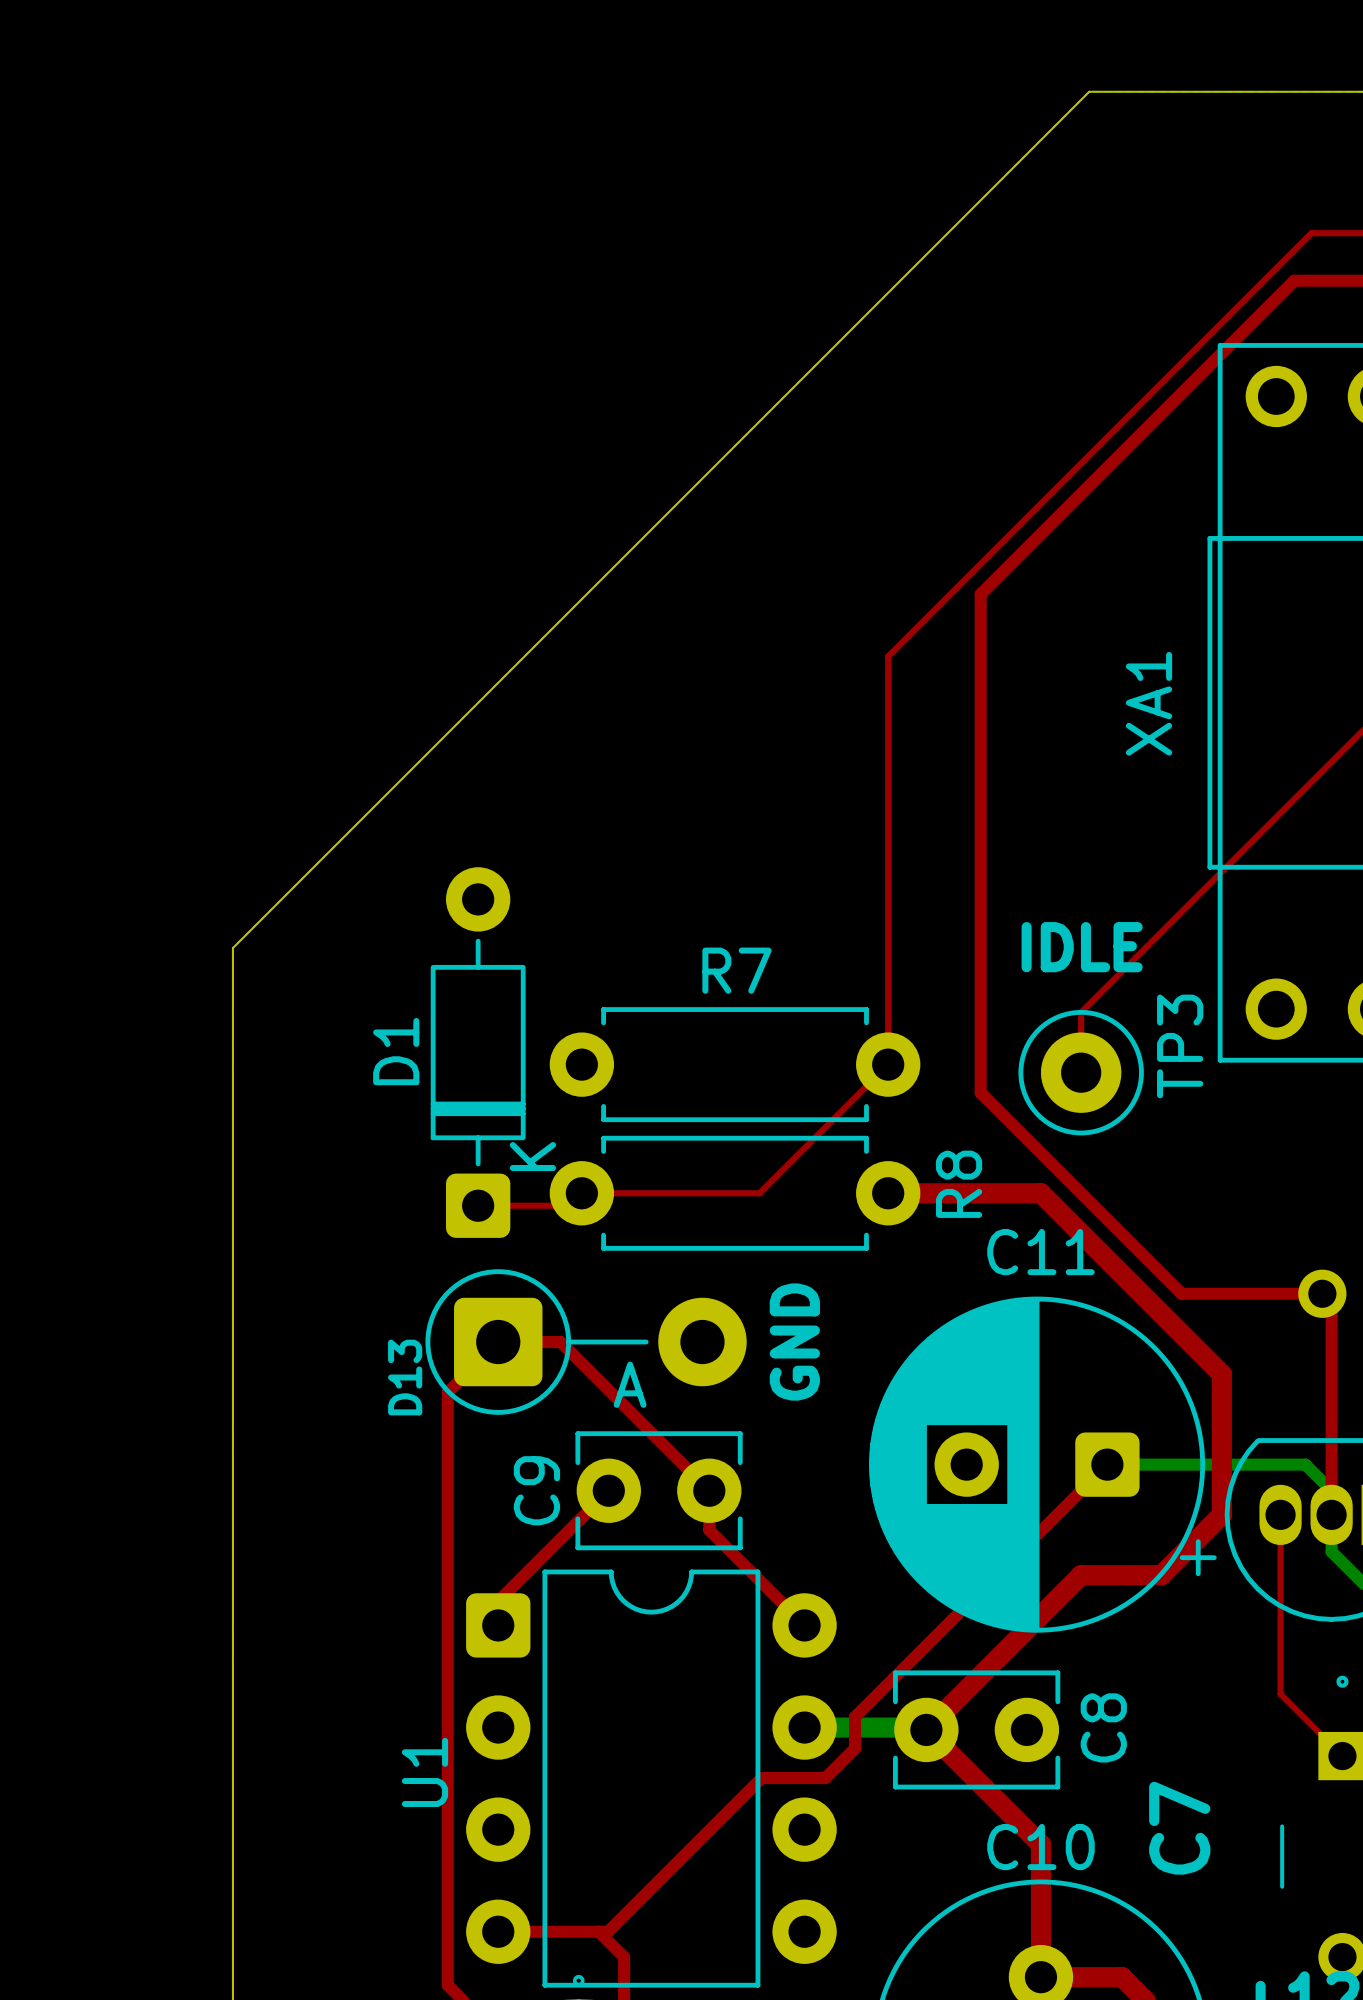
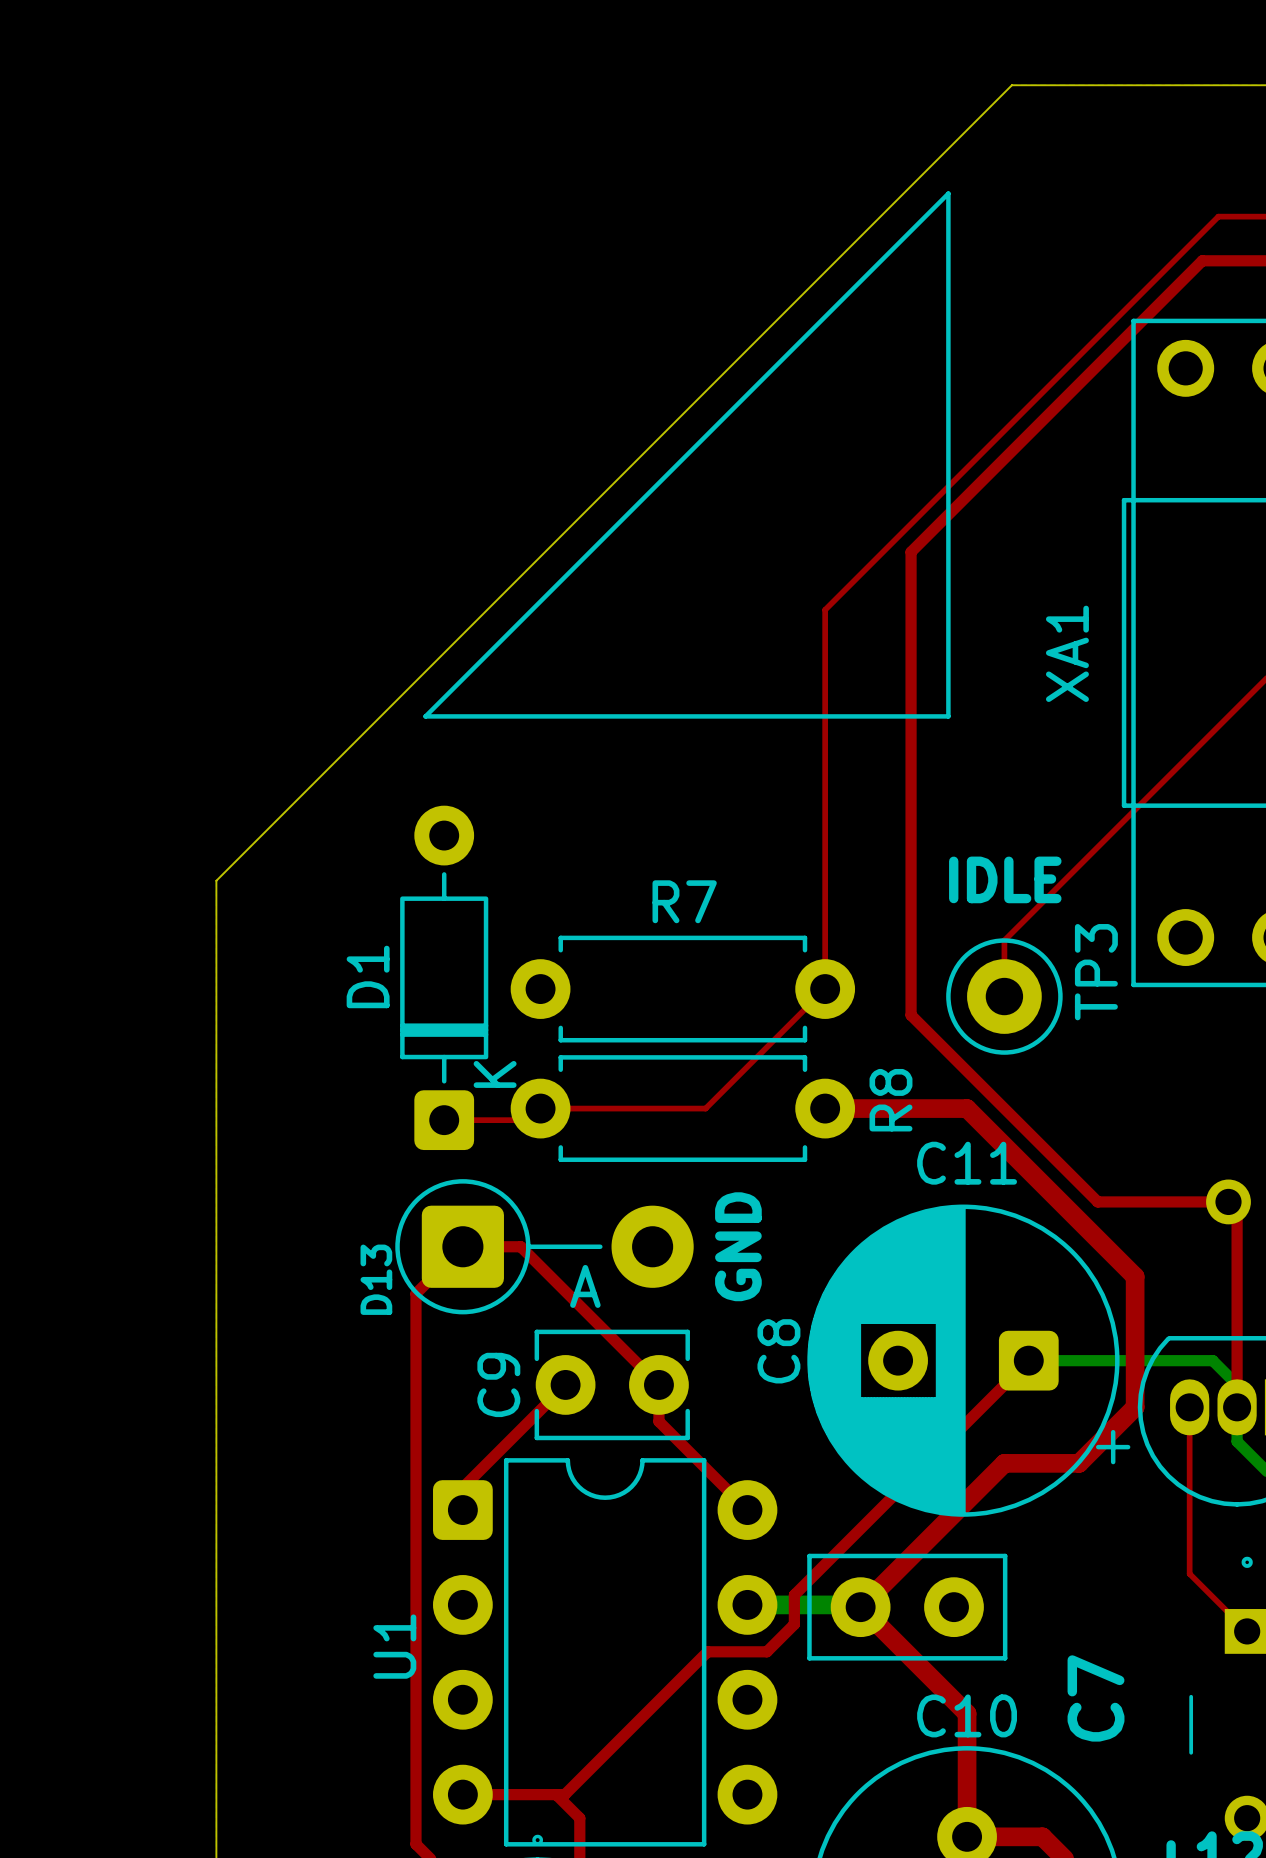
line: none -> (948, 193) (425, 716) (948, 716) (948, 193)
C8 footprint: [893, 1670, 1061, 1790] -> [807, 1553, 1008, 1661]
C8 name position: C8 (1103, 1727) -> C8 (778, 1351)

